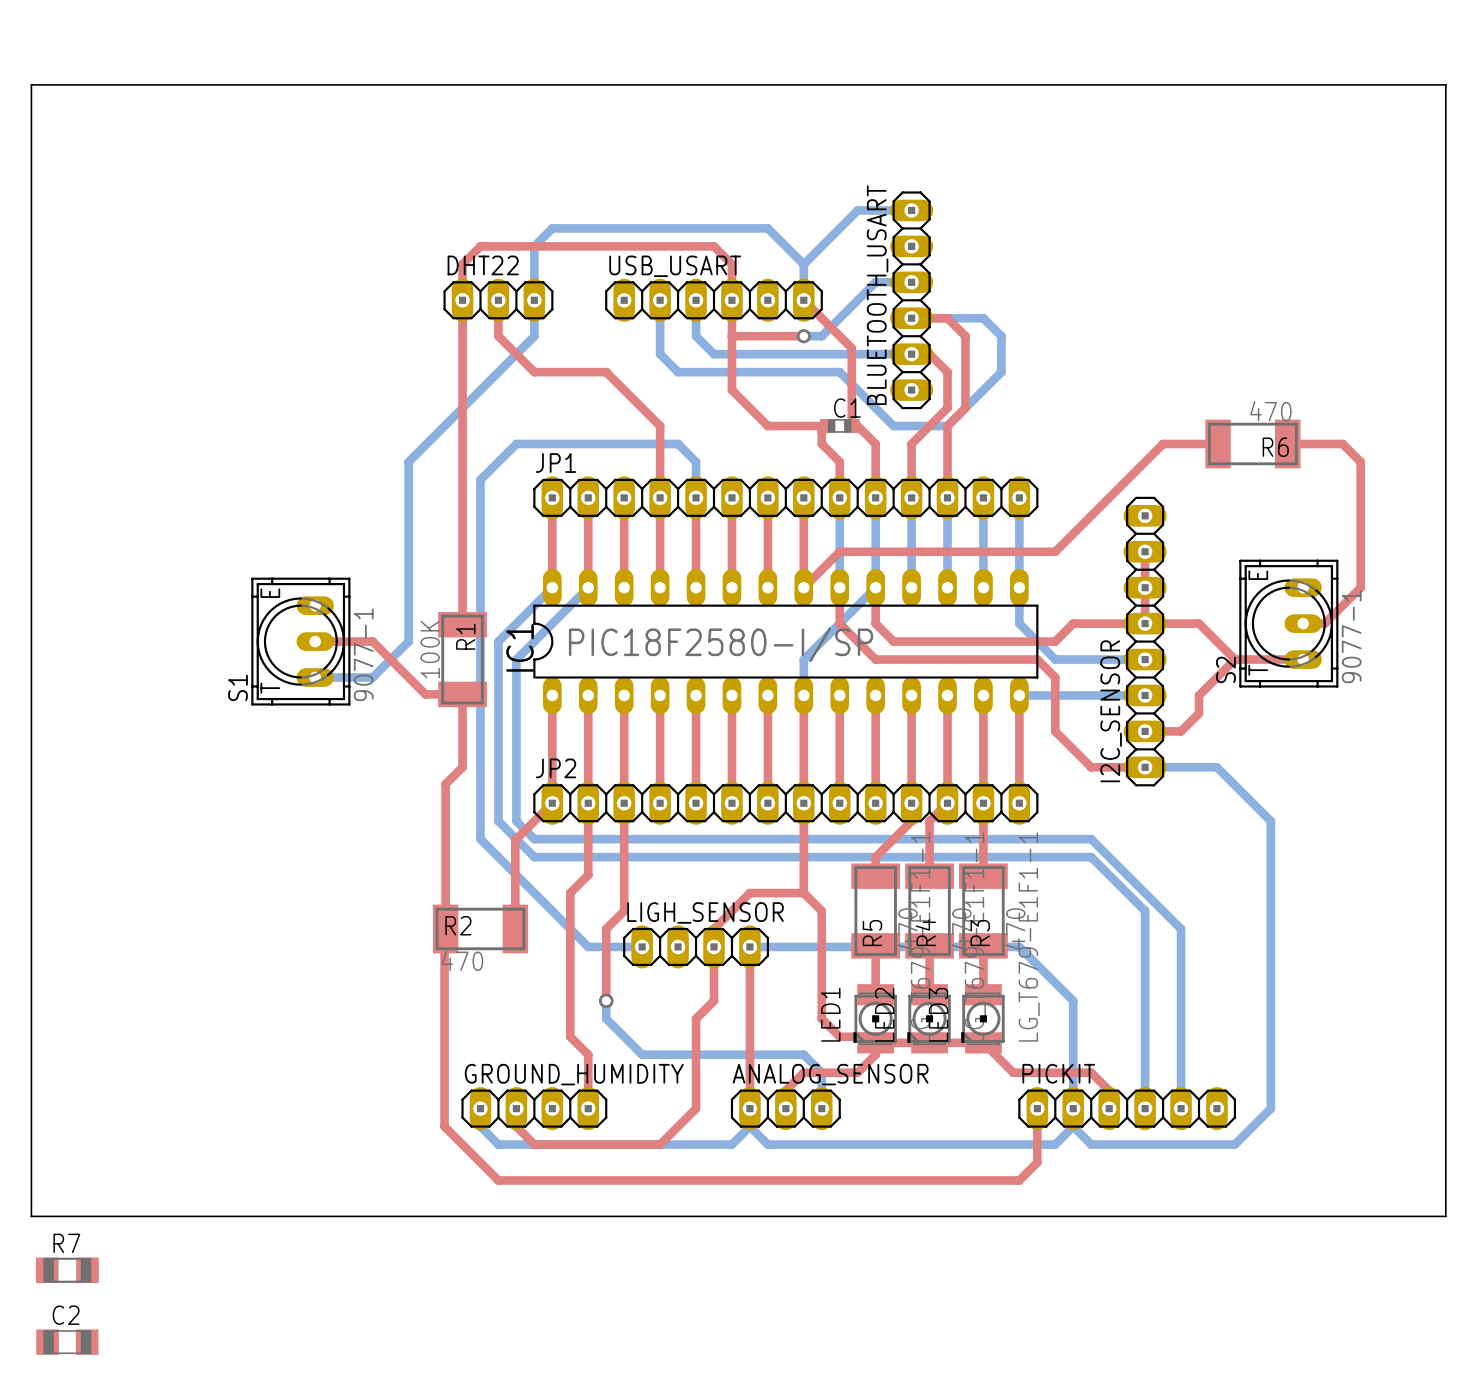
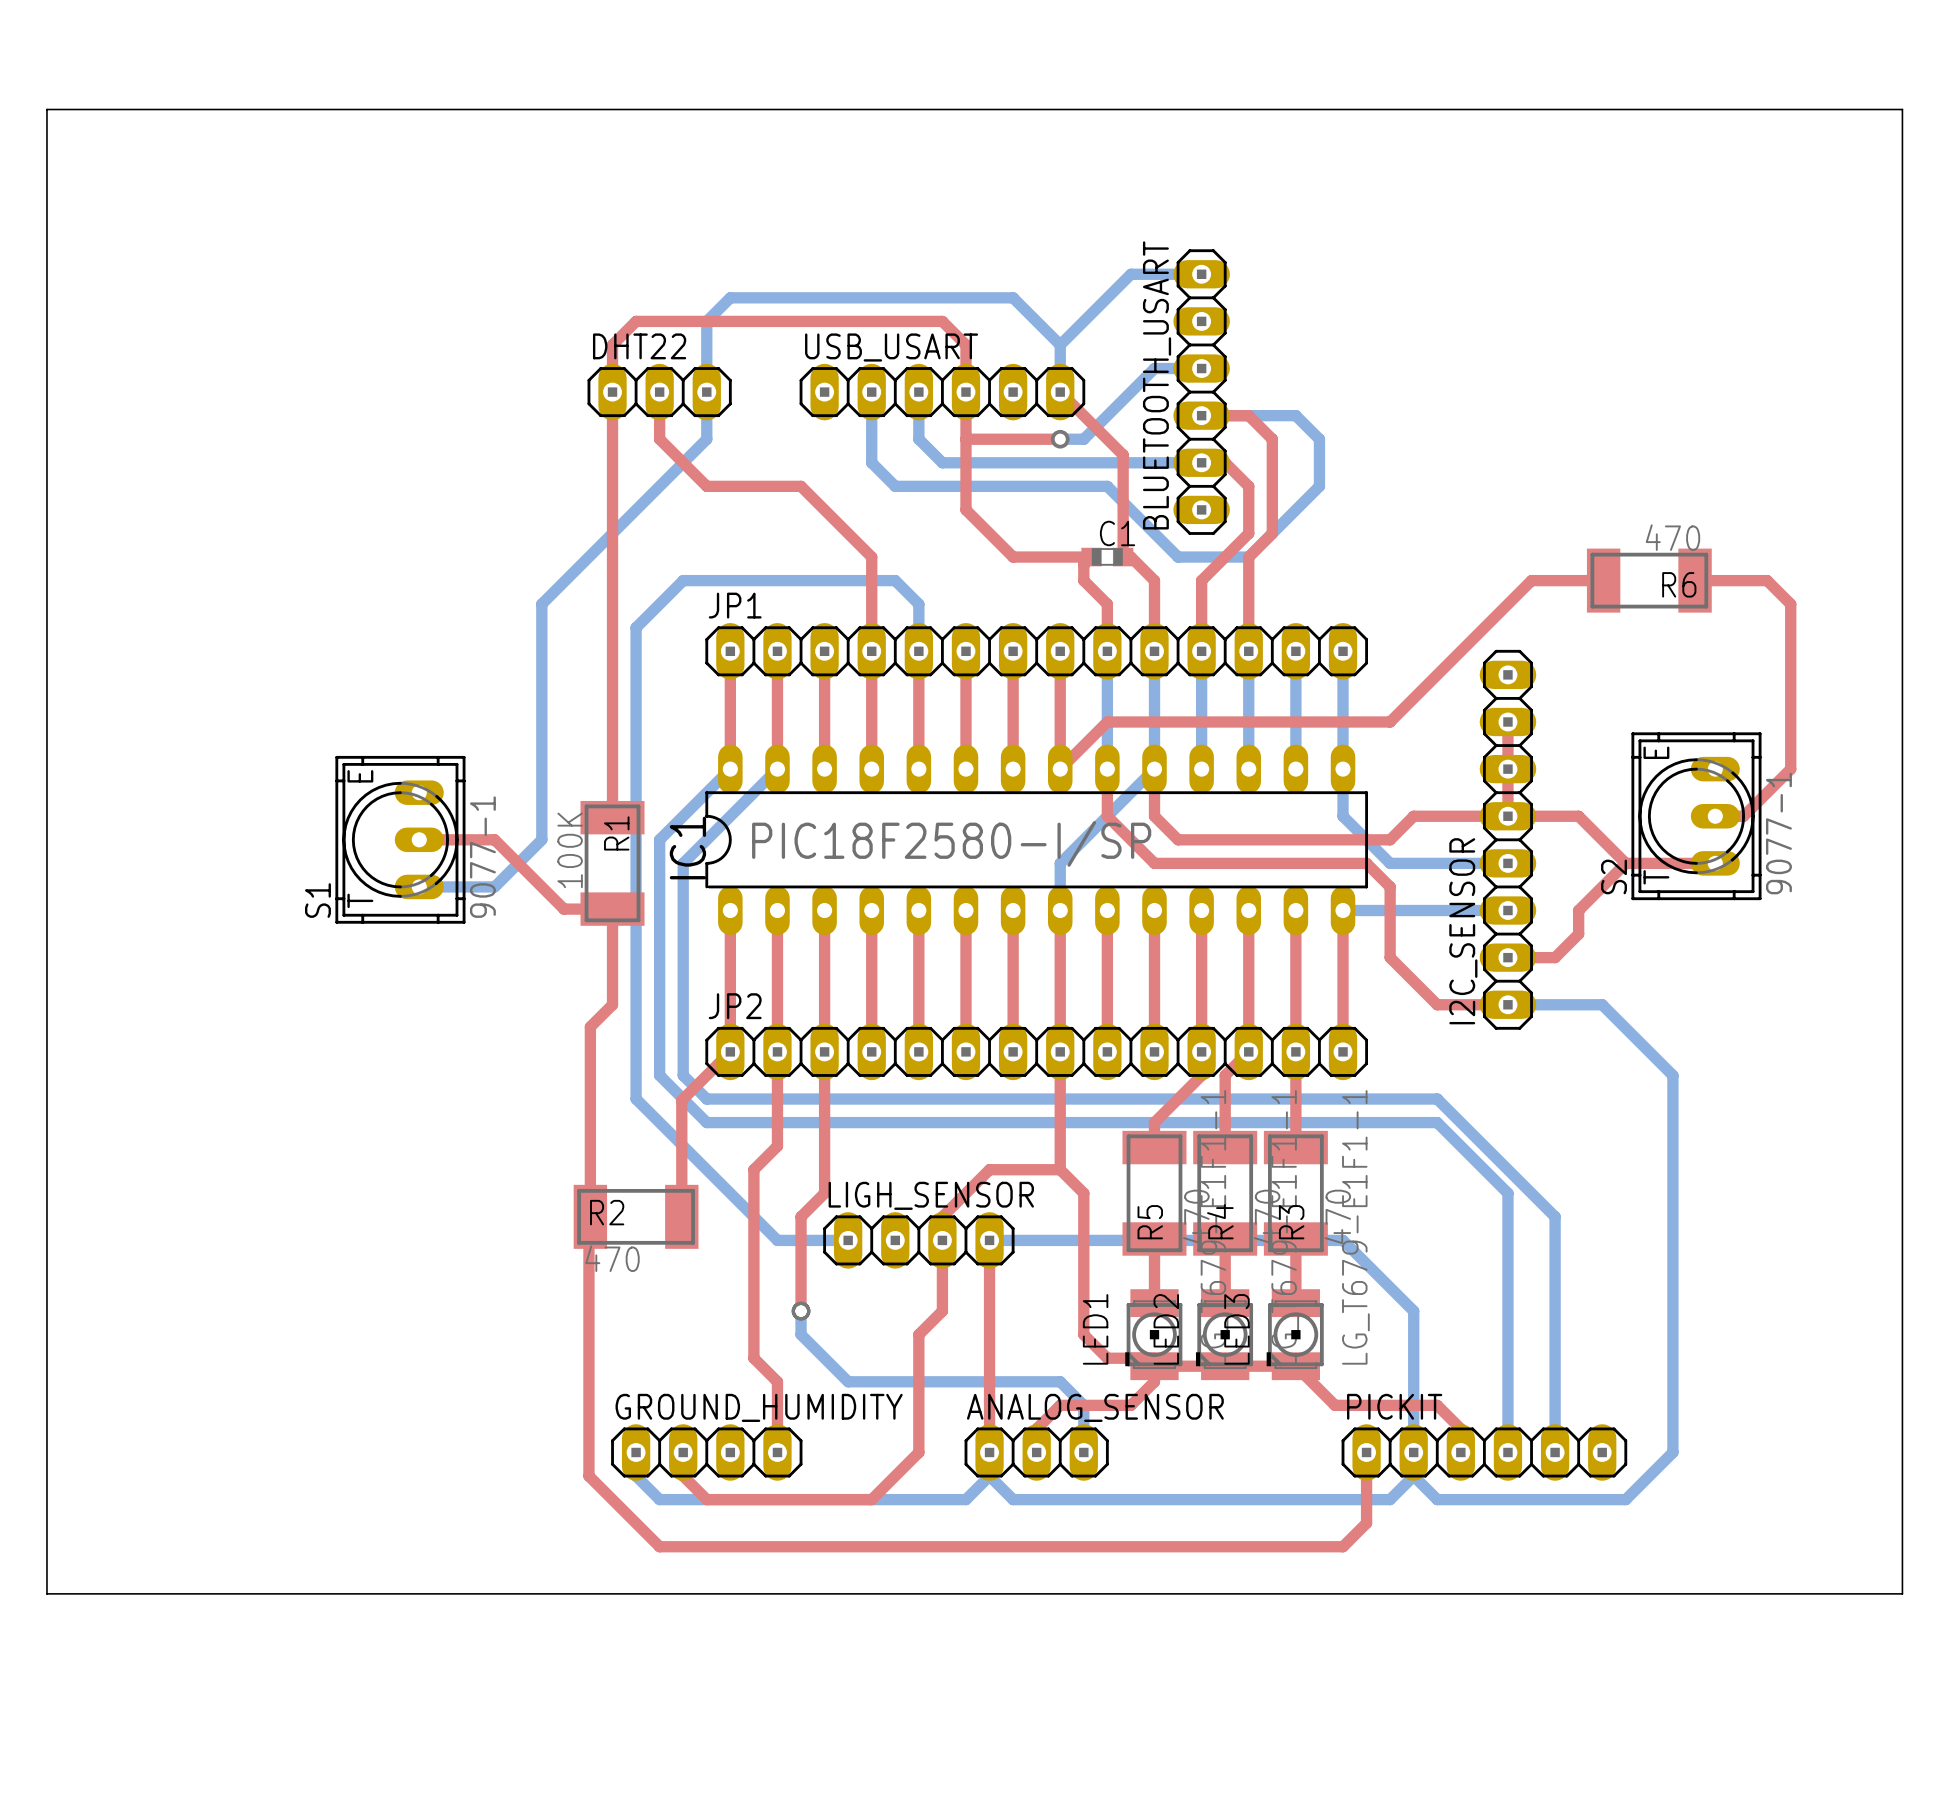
R7: (67, 1270) -> none
C2: (67, 1342) -> none

